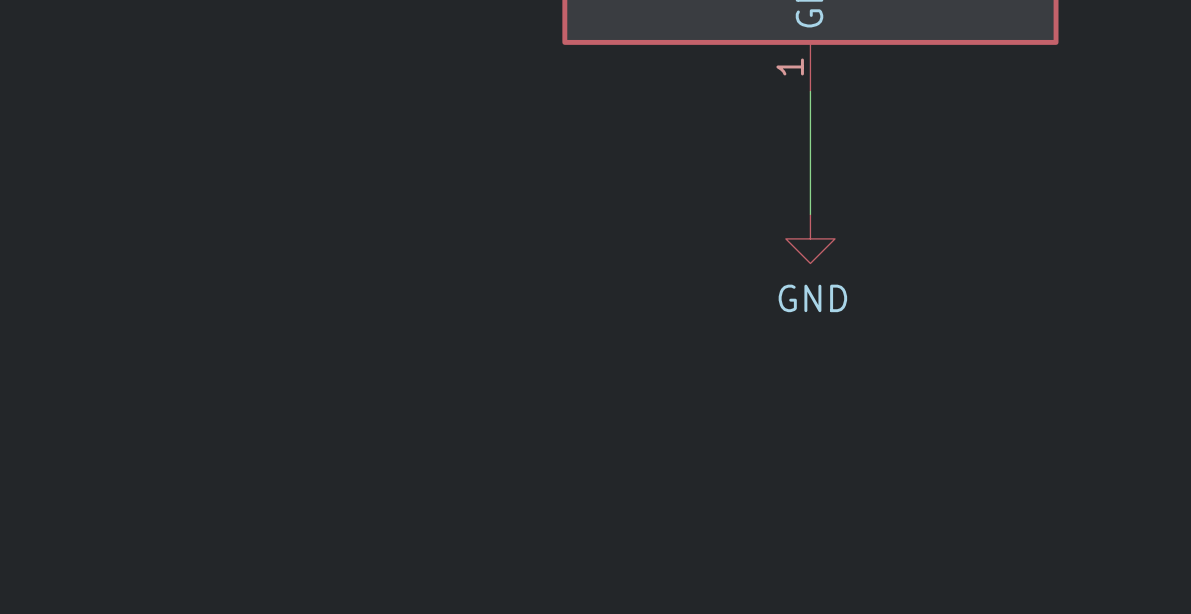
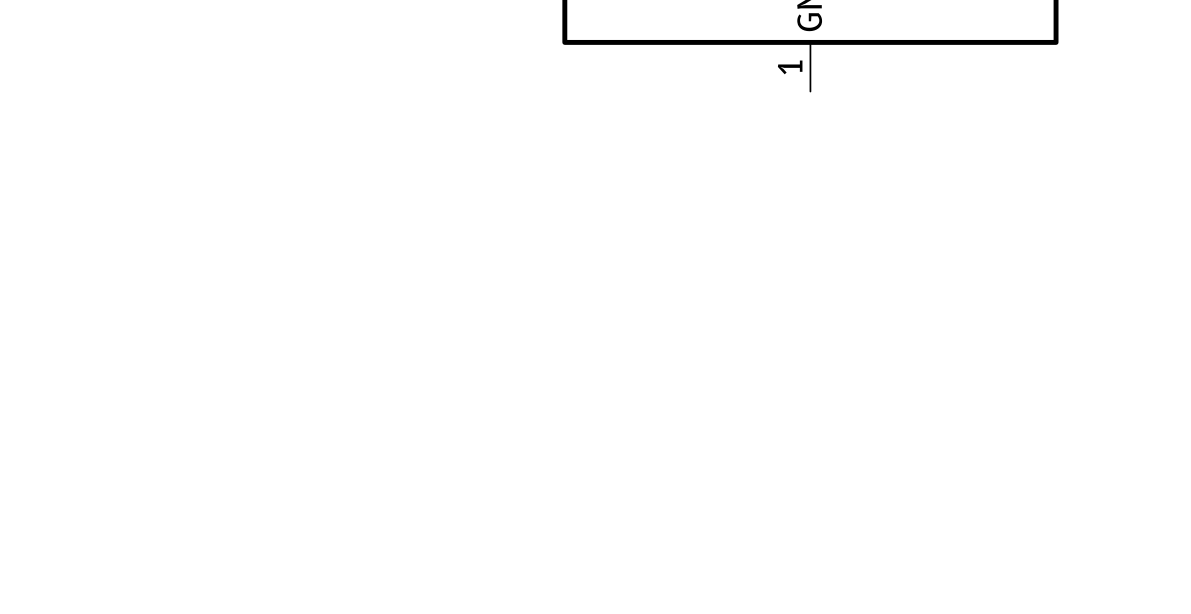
wire: (810, 91) (810, 214) -> none
power symbol: GND (810, 238) -> none

